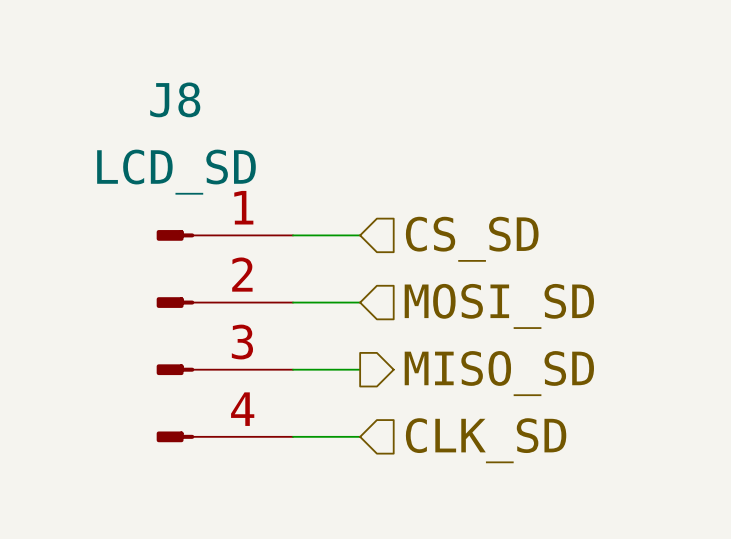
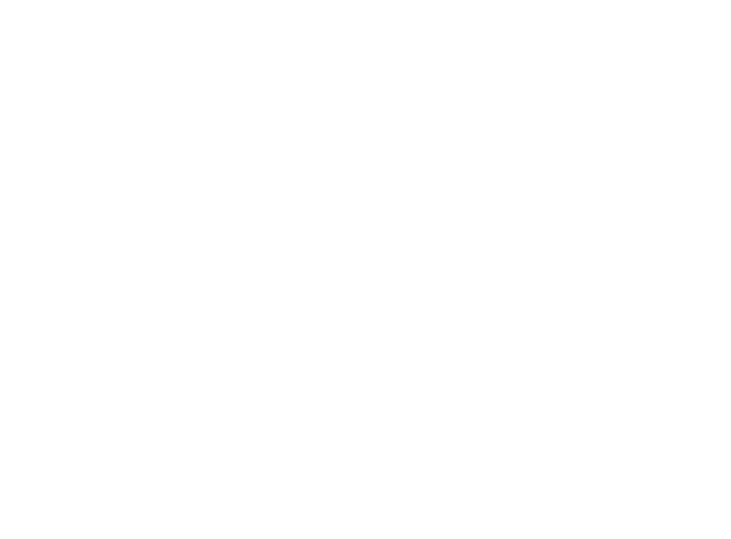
wire: (292, 235) (360, 235) -> none
hierarchical label: CS_SD (472, 239) -> none
wire: (292, 302) (360, 302) -> none
hierarchical label: MOSI_SD (499, 306) -> none
J8: LCD_SD (224, 336) -> none
wire: (292, 369) (360, 369) -> none
hierarchical label: MISO_SD (499, 373) -> none
wire: (292, 436) (360, 436) -> none
hierarchical label: CLK_SD (486, 440) -> none

